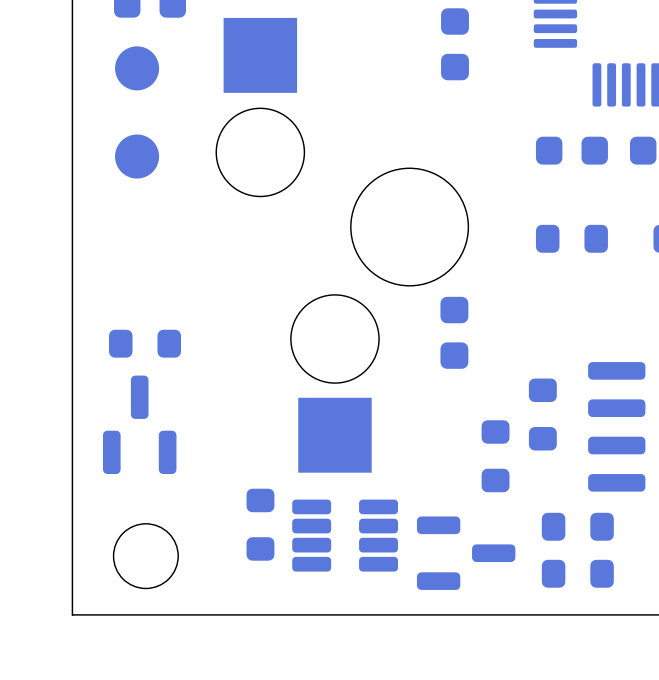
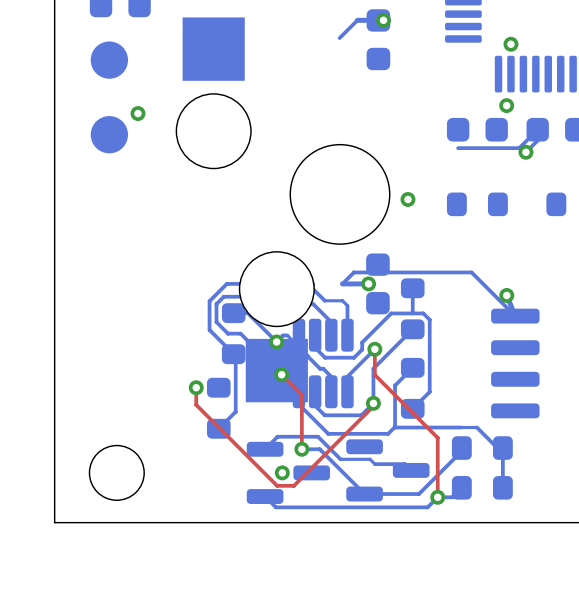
bottom track: none -> (383, 20) (357, 20) (339, 38)
via: none -> (383, 20)
via: none -> (510, 44)
via: none -> (506, 105)
via: none -> (137, 113)
bottom track: none -> (458, 148) (519, 148) (537, 129) (537, 140) (525, 152)
via: none -> (525, 152)
via: none -> (407, 199)
bottom track: none -> (368, 283) (342, 283) (353, 272) (471, 272) (515, 316) (506, 295)
via: none -> (368, 283)
bottom track: none -> (412, 288) (412, 313)
part: (145, 343) -> none
via: none -> (506, 295)
bottom track: none -> (233, 313) (247, 313) (276, 341) (283, 335) (287, 335) (320, 368) (323, 368) (331, 376) (331, 391)
bottom track: none -> (412, 329) (373, 368) (373, 403) (361, 415) (324, 415) (315, 405) (315, 391)
part: none -> (233, 333)
bottom track: none -> (315, 335) (315, 347) (325, 357) (354, 357) (362, 349) (362, 342) (391, 313) (423, 313) (429, 319) (429, 391) (412, 408)
bottom track: none -> (331, 335) (331, 322) (313, 304) (254, 304) (246, 296) (223, 296) (216, 304) (216, 322) (228, 333) (240, 333) (281, 374)
bottom track: none -> (347, 335) (347, 305) (342, 300) (324, 300) (312, 288) (312, 283) (226, 283) (209, 301) (209, 330) (235, 356) (235, 411) (218, 428)
via: none -> (276, 341)
top track: none -> (374, 349) (374, 374) (437, 437) (437, 497)
bottom track: none -> (374, 349) (347, 376) (347, 391)
via: none -> (374, 349)
part position: (542, 414) -> (412, 308)
part: (139, 424) -> none
part: none -> (323, 363)
bottom track: none -> (412, 367) (395, 385) (395, 426)
top track: none -> (281, 374) (301, 394) (301, 449)
via: none -> (281, 374)
top track: none -> (196, 387) (196, 404) (277, 485) (293, 485) (373, 406) (373, 403)
via: none -> (196, 387)
bottom track: none -> (298, 391) (298, 404) (328, 433) (388, 433) (395, 426)
via: none -> (373, 403)
part footprint: [292, 499, 399, 572] -> [246, 441, 331, 504]
bottom track: none -> (395, 426) (476, 427) (497, 448) (502, 448) (502, 487)
part position: (260, 524) -> (218, 408)
bottom track: none -> (461, 448) (461, 451) (418, 494) (364, 494) (319, 449) (301, 449)
bottom track: none -> (265, 449) (277, 436) (318, 436) (340, 459) (370, 459) (374, 464) (404, 464) (411, 470)
via: none -> (301, 449)
via: none -> (282, 472)
bottom track: none -> (461, 487) (452, 497) (437, 497) (427, 507) (275, 507) (265, 496)
via: none -> (437, 497)

